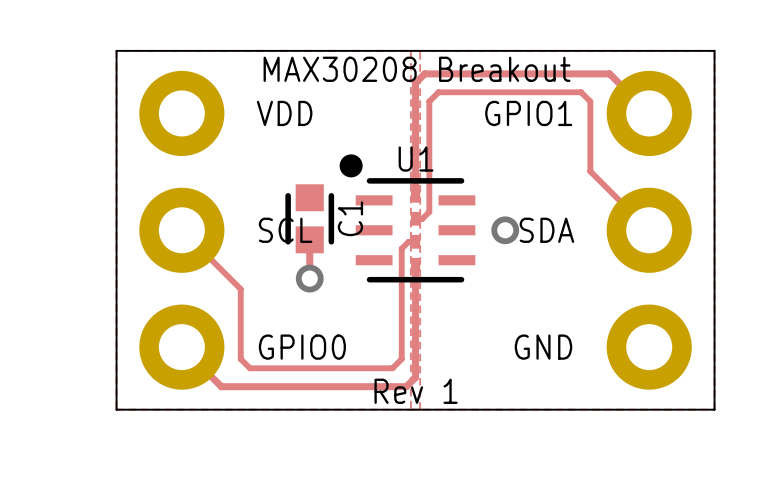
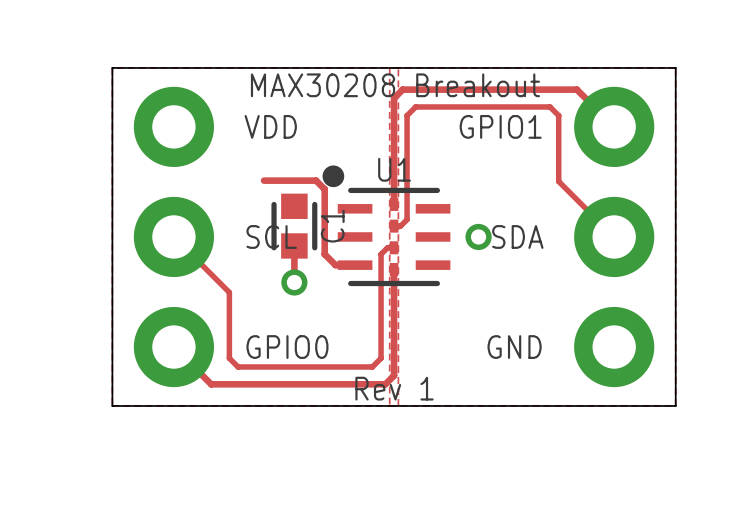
track: none -> (264, 180) (316, 180) (324, 189) (324, 254) (335, 265) (355, 265)

